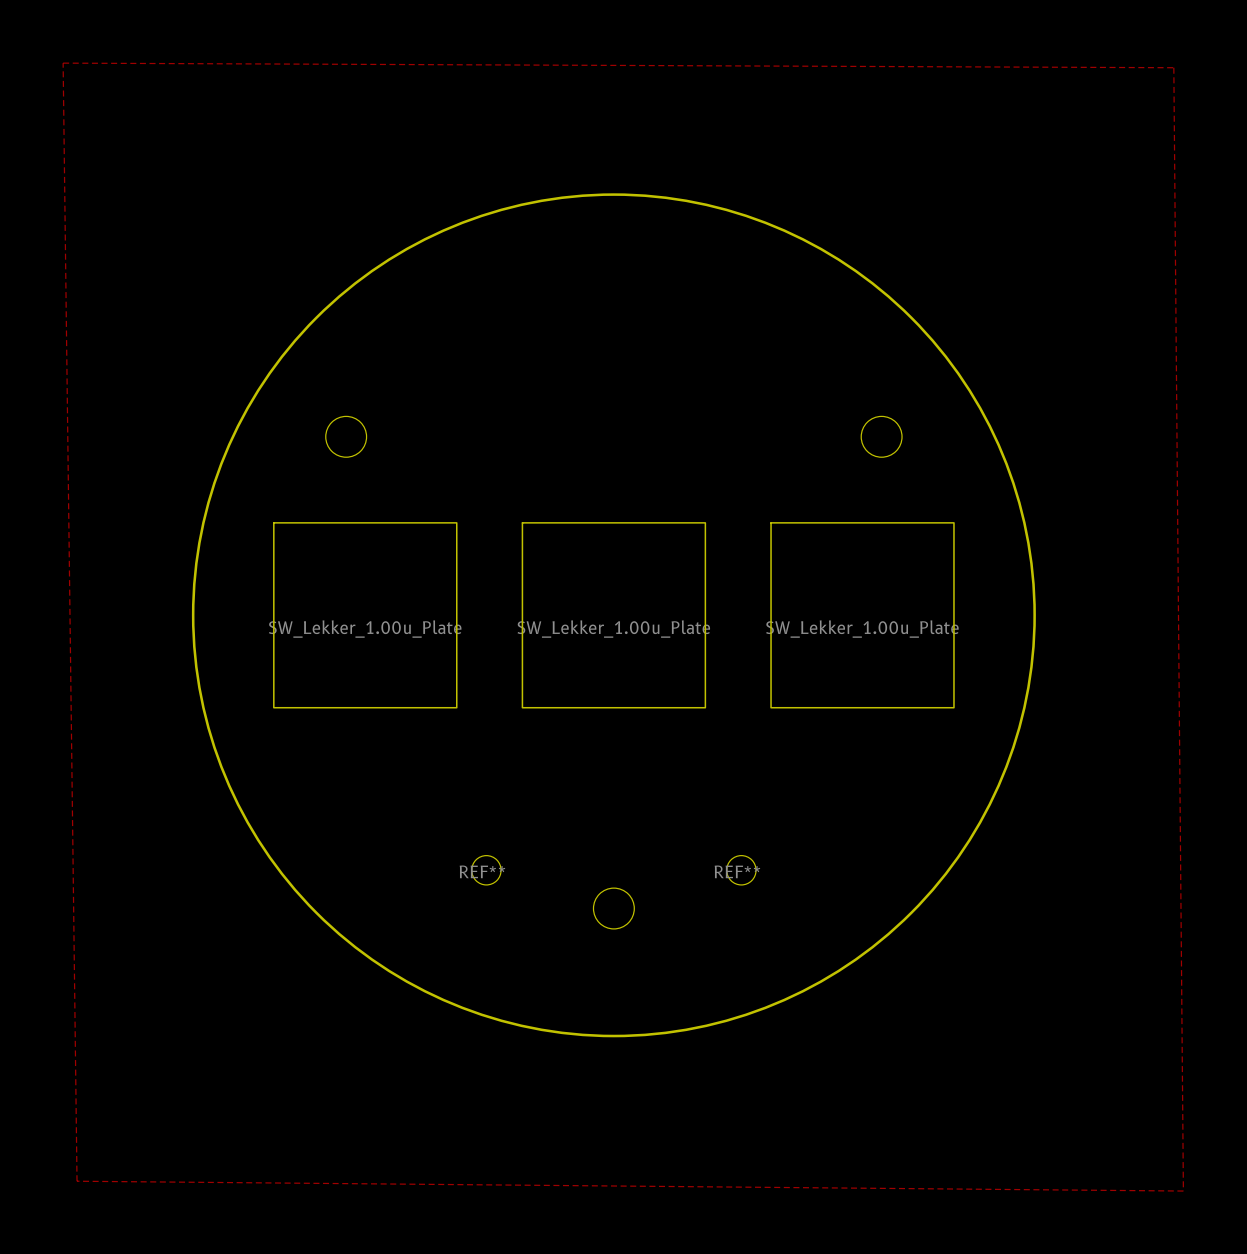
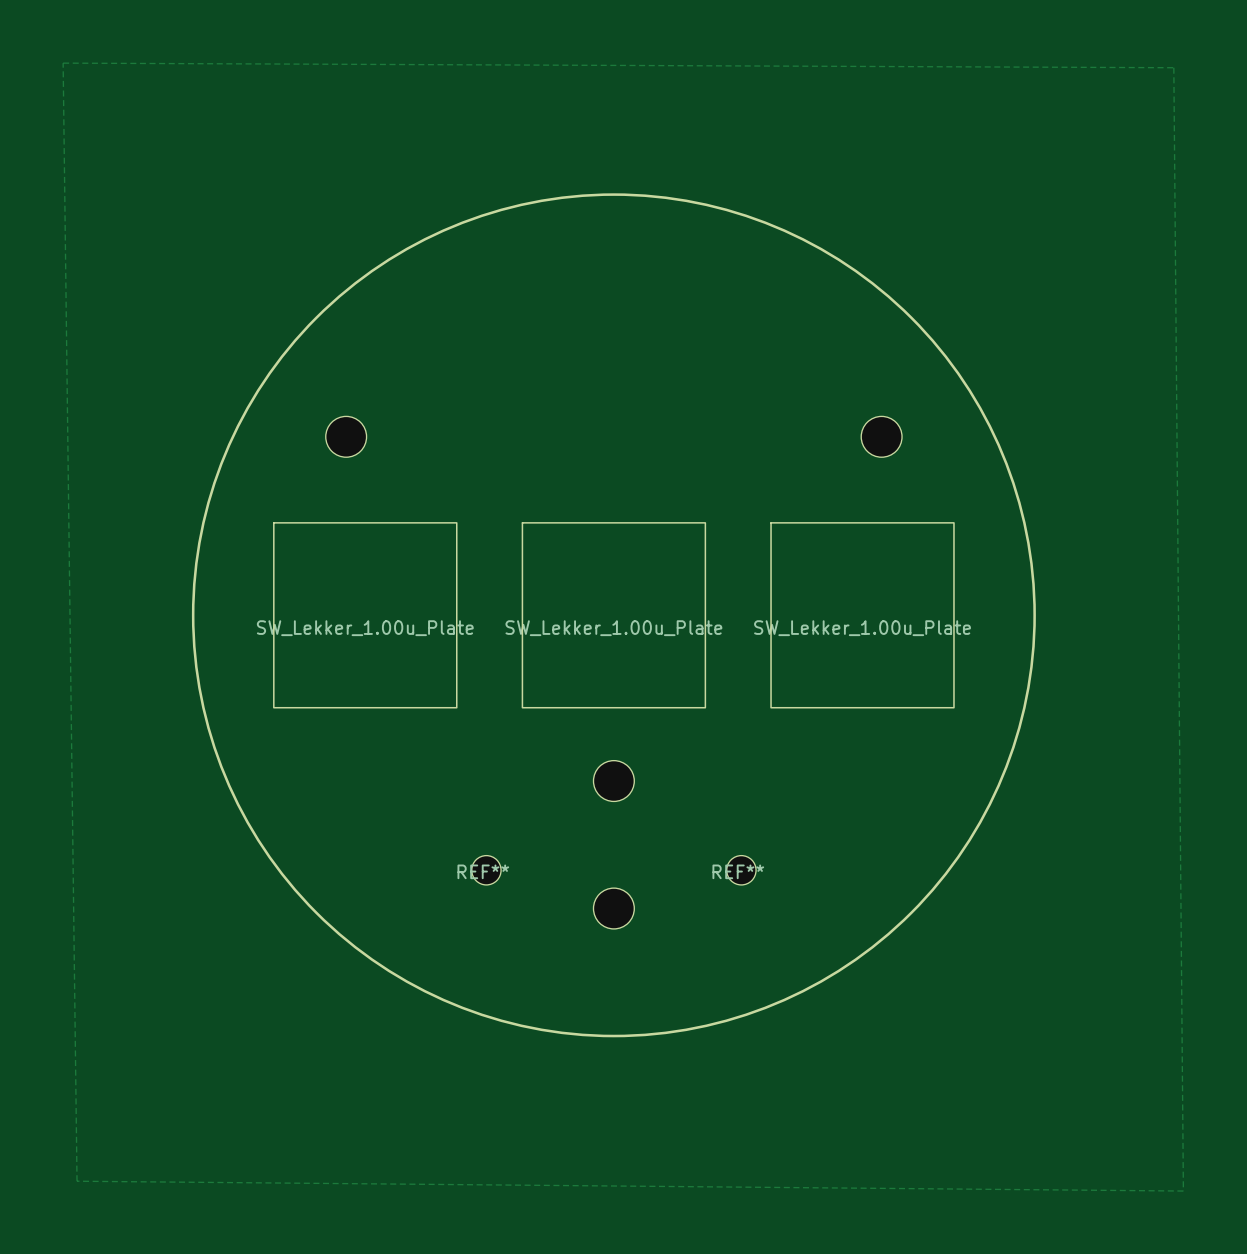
part: none -> (613, 781)

